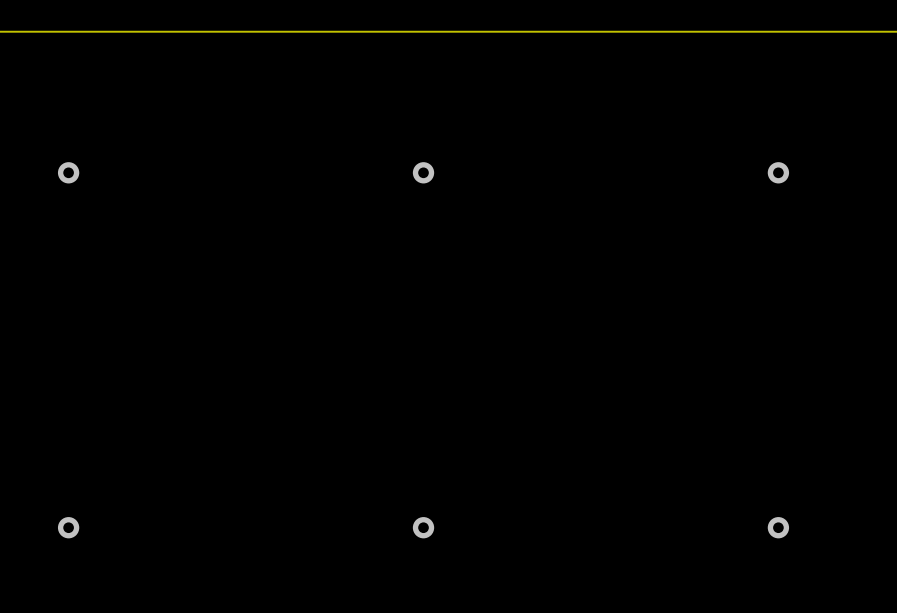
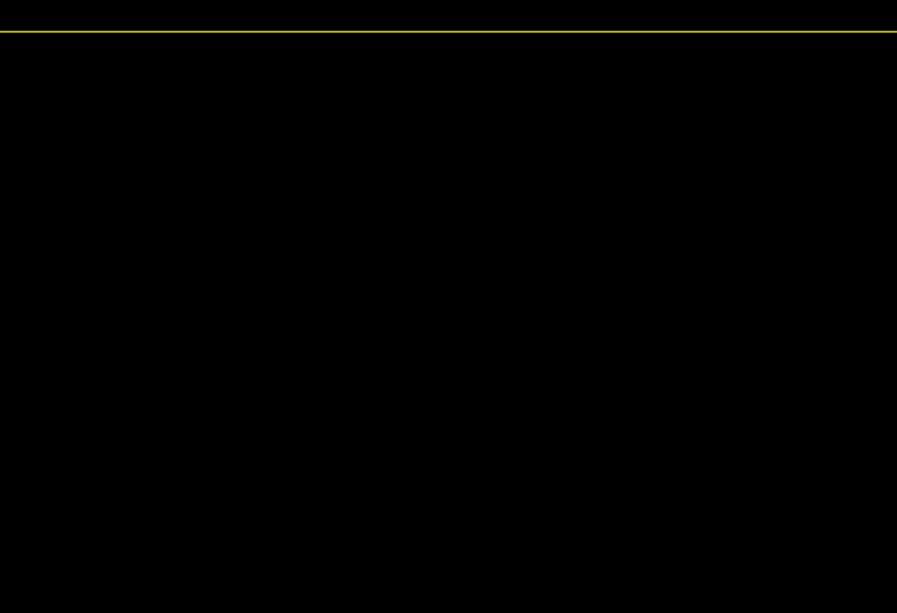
via: (68, 172) -> none
via: (423, 172) -> none
via: (778, 172) -> none
via: (68, 527) -> none
via: (423, 527) -> none
via: (778, 527) -> none

